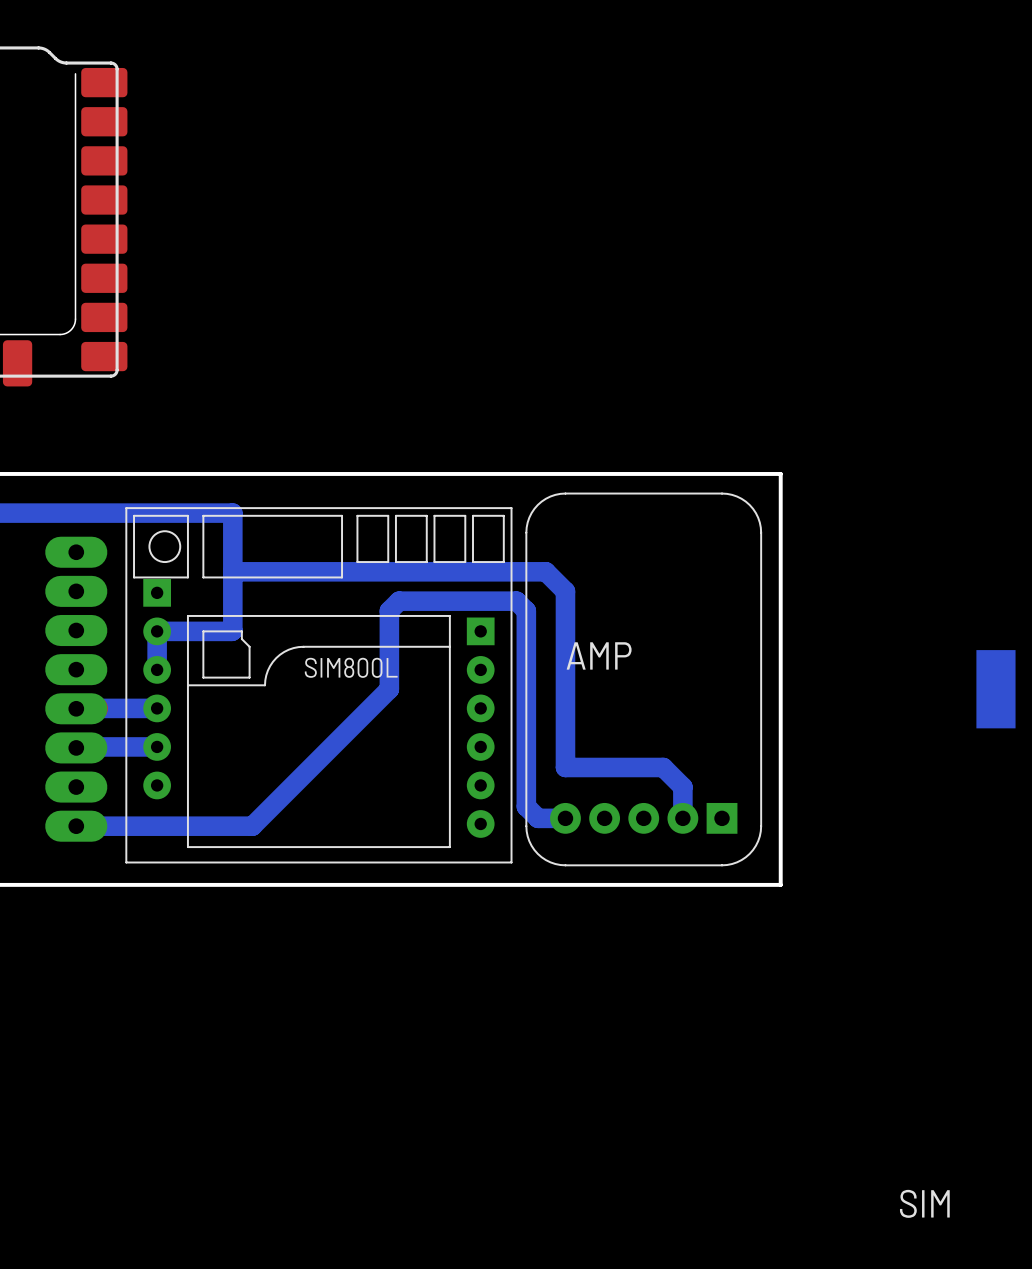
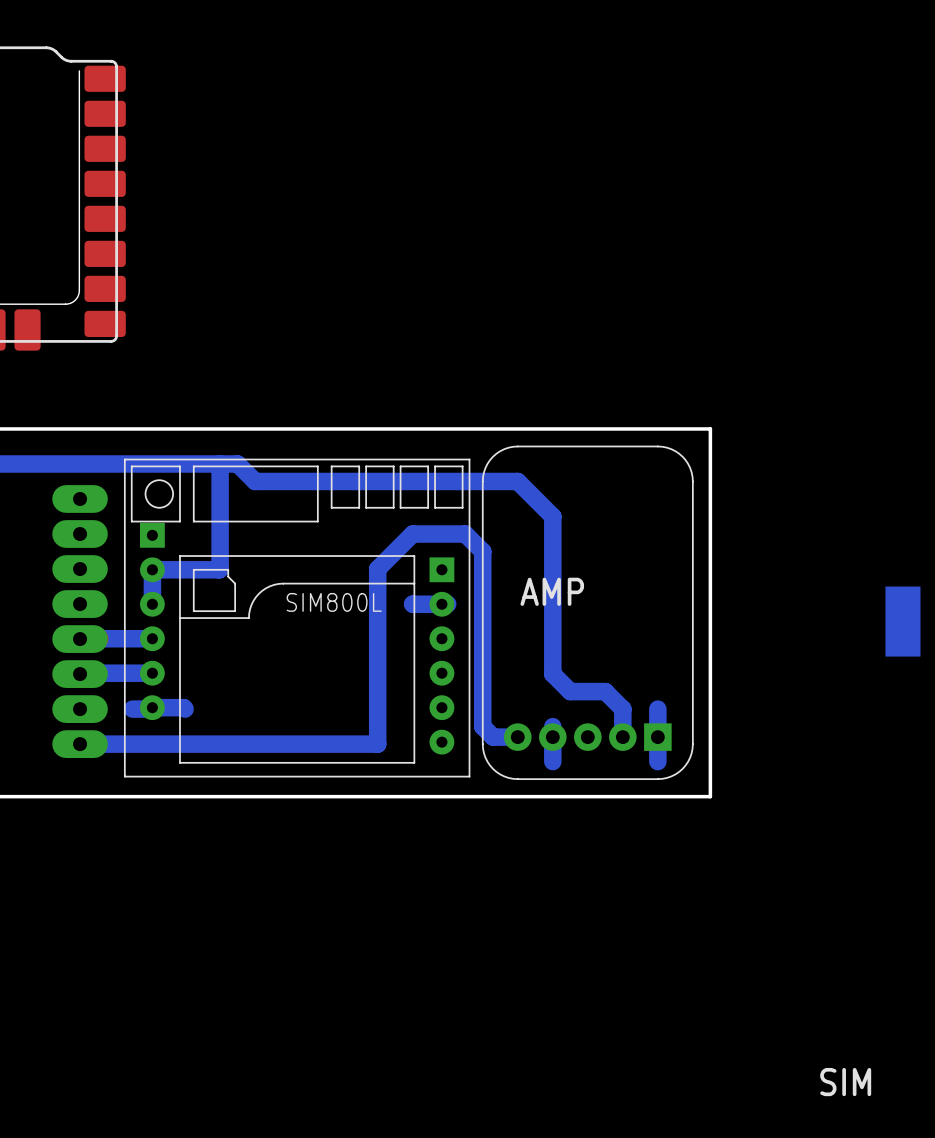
bottom track: (232, 571) (545, 571) (565, 591) (565, 767) (624, 767) -> (220, 463) (237, 463) (255, 481) (517, 481) (552, 516) (552, 674) (570, 691)
bottom track: (516, 601) (399, 601) (389, 610) (389, 689) (252, 826) -> (474, 542) (465, 534) (412, 534) (377, 569) (377, 744) (237, 744)
bottom track: none -> (412, 604) (447, 604)
bottom track: none -> (132, 709) (185, 709)
bottom track: none -> (657, 709) (657, 761)
bottom track: none -> (552, 726) (552, 761)

